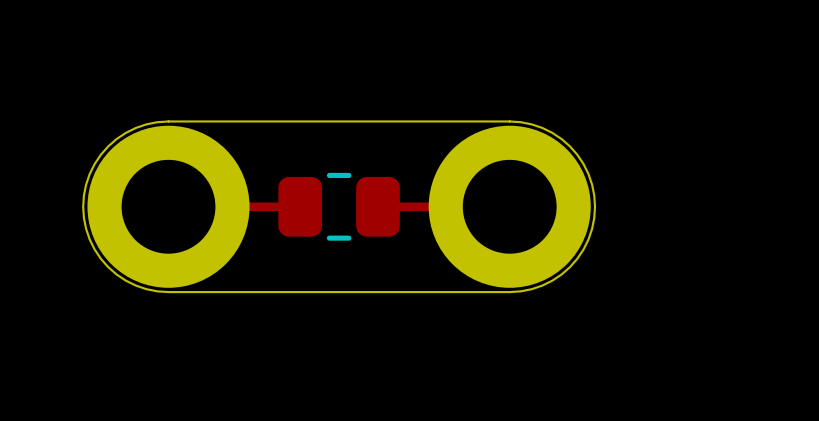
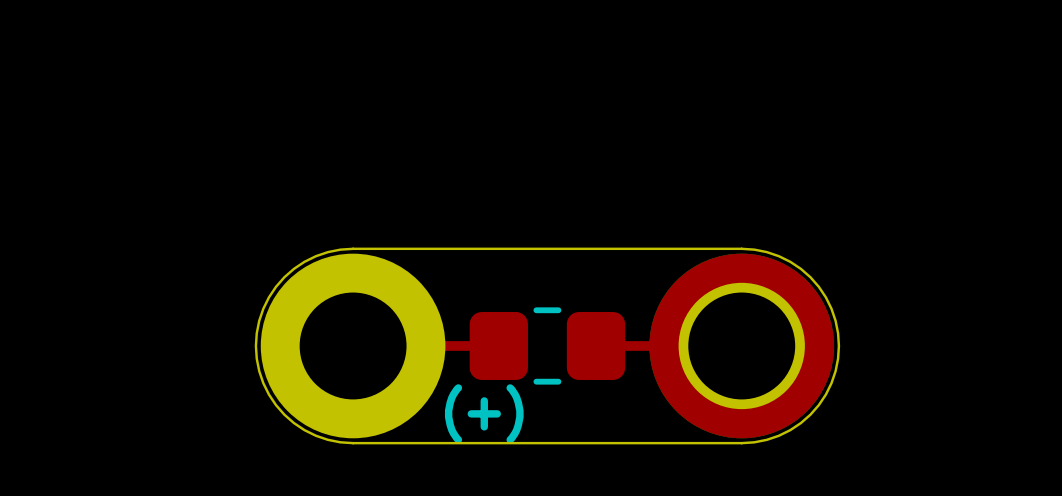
part footprint: [428, 125, 591, 288] -> [649, 253, 835, 439]
part footprint: [278, 172, 400, 241] -> [469, 307, 626, 385]
text: none -> (+) (484, 413)

